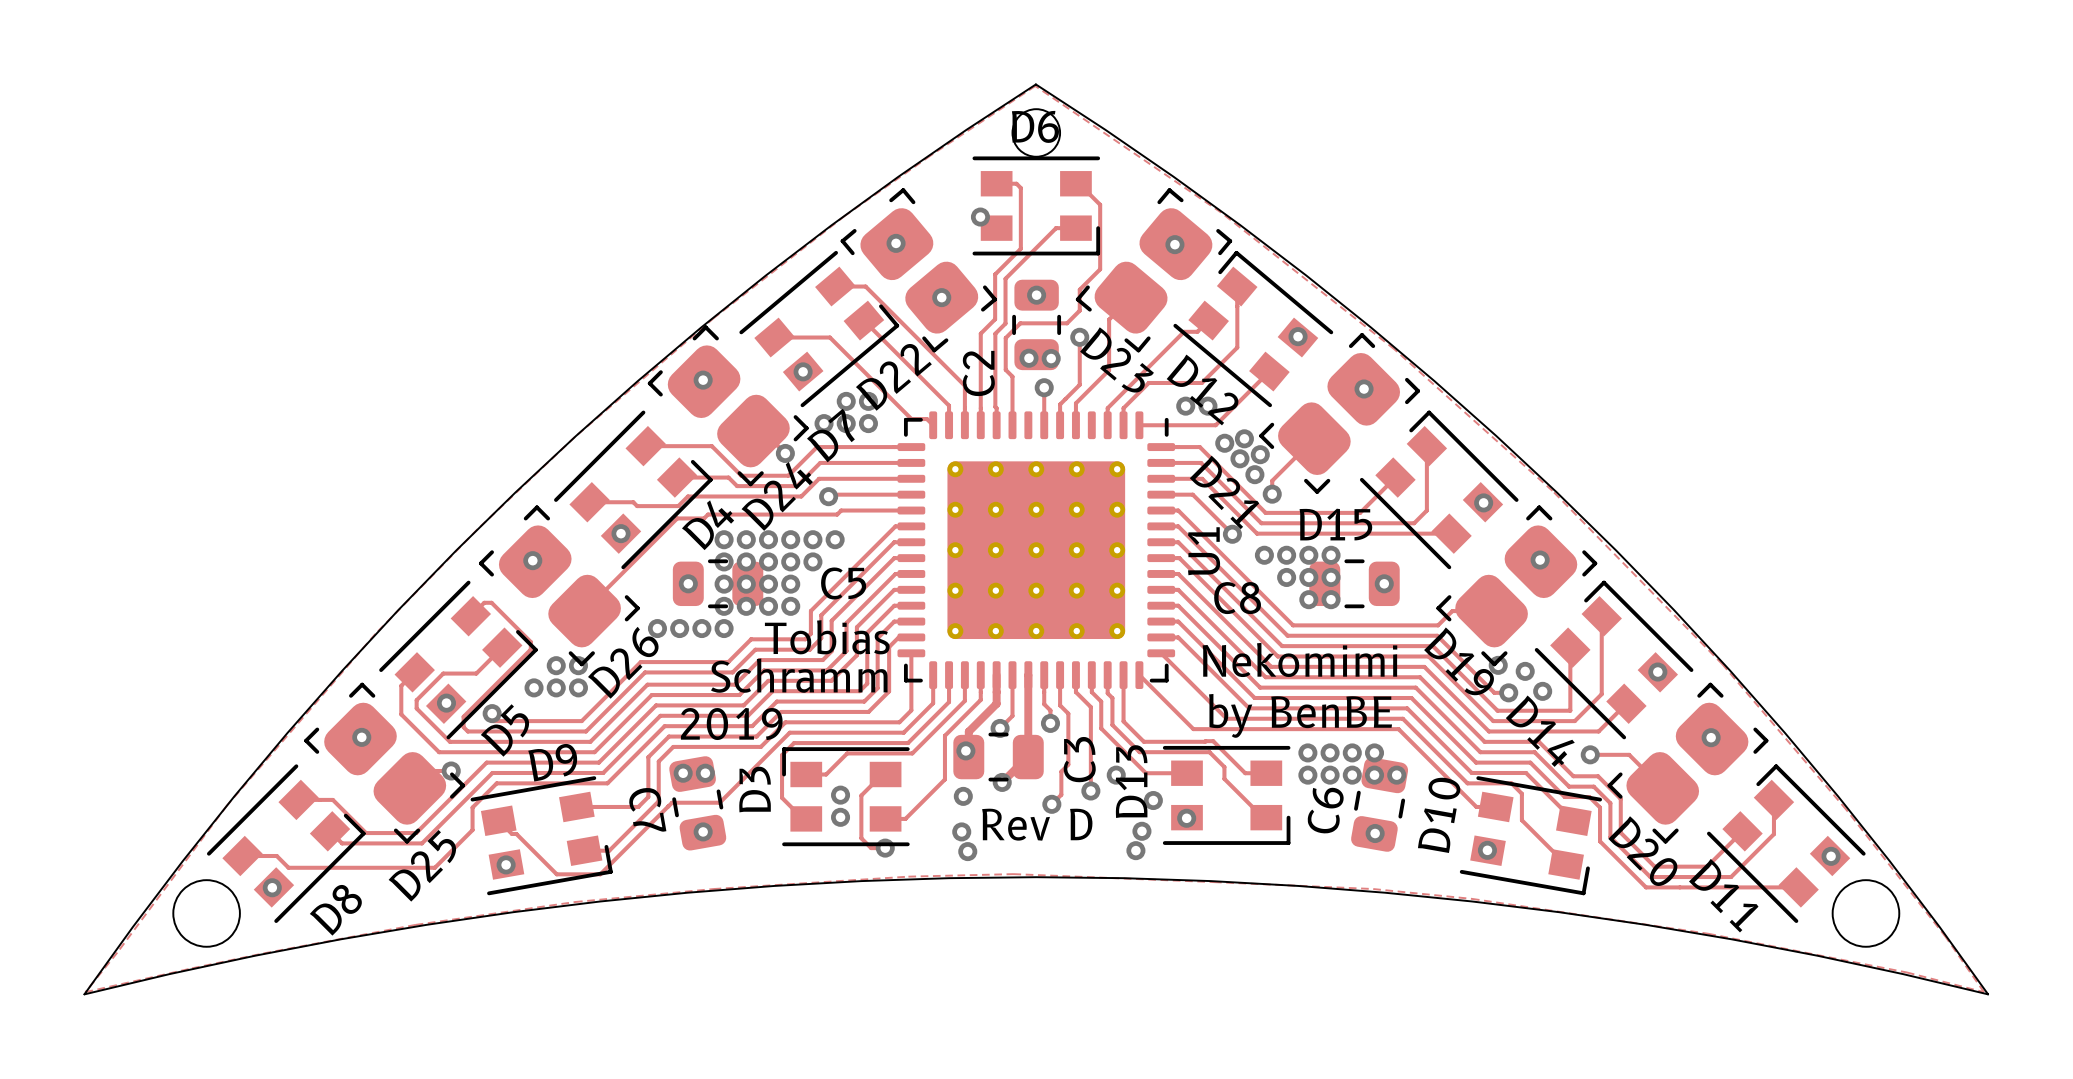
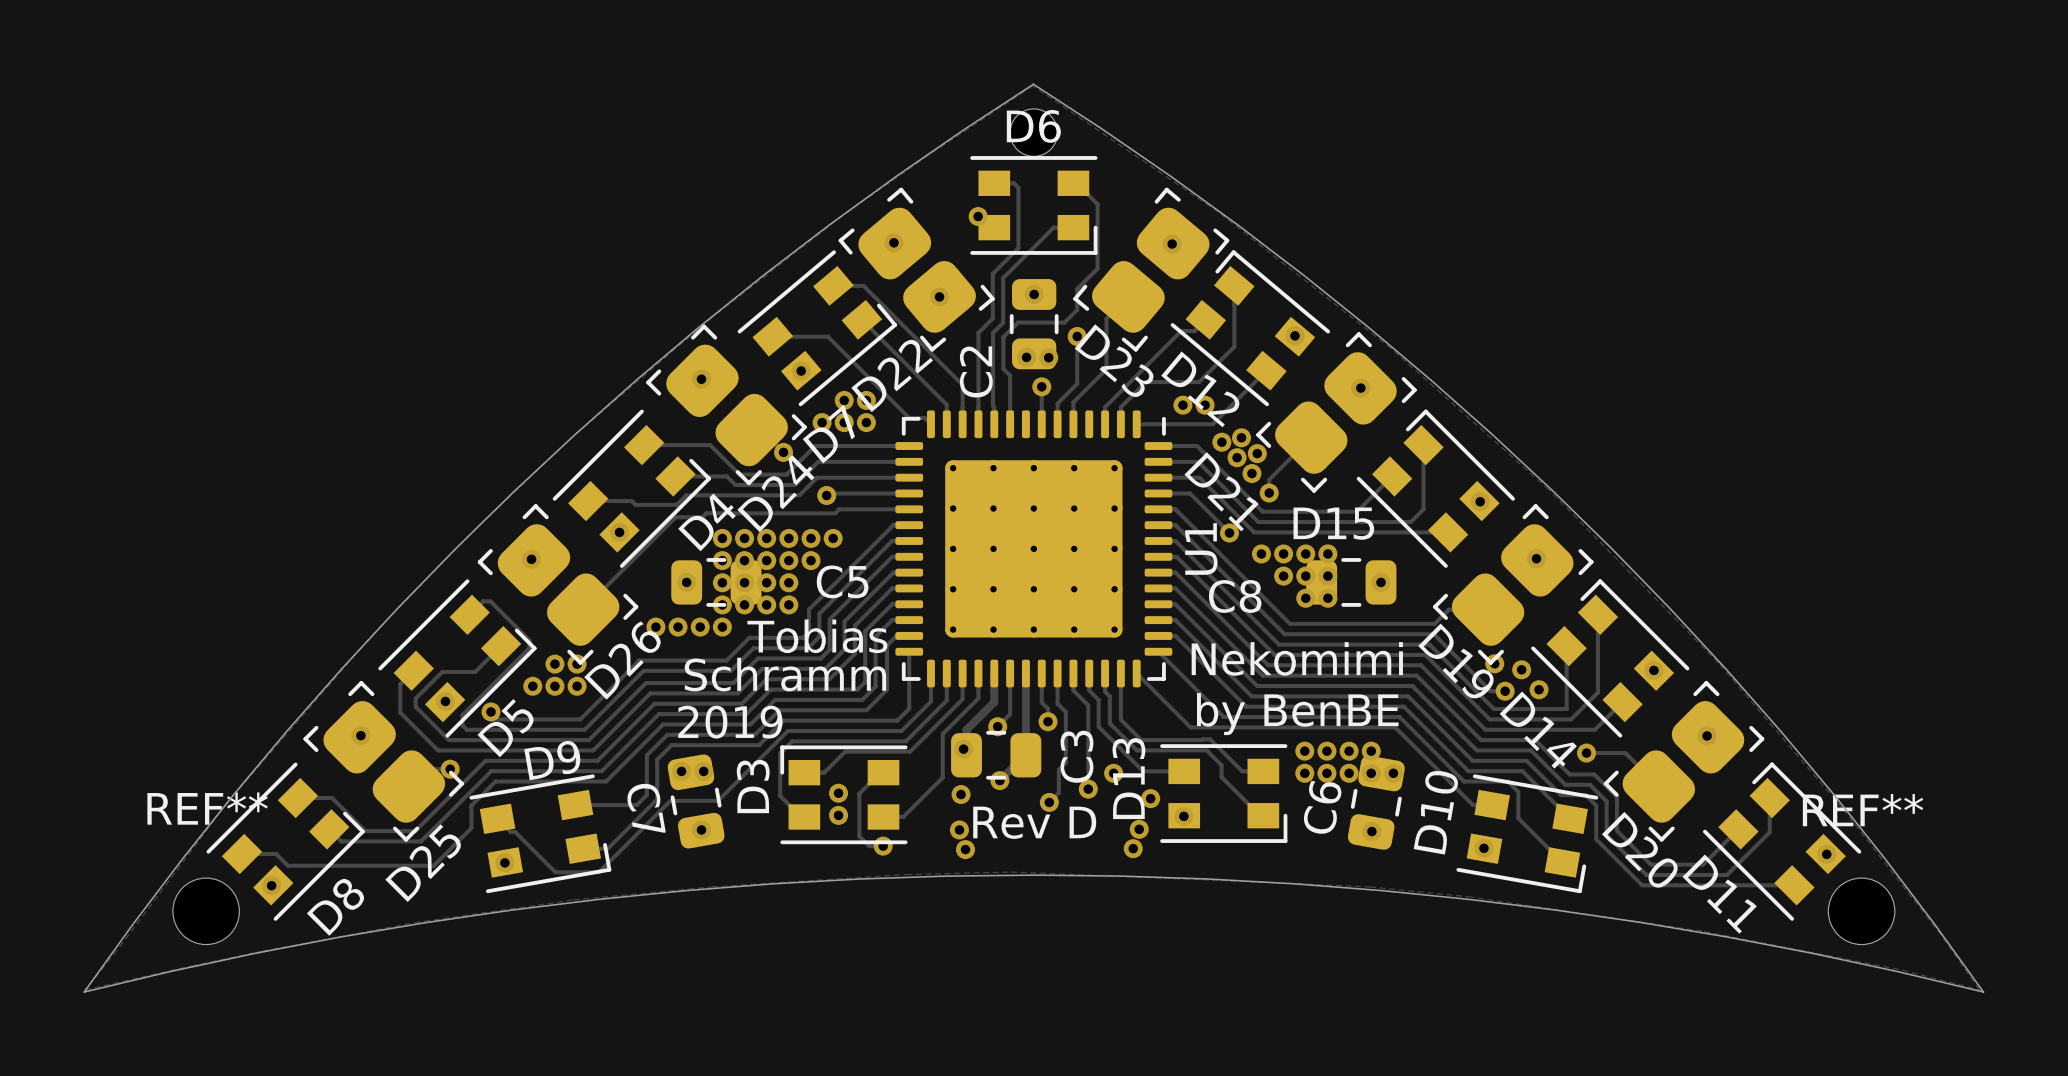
REF** name: none -> REF** (207, 808)
REF** name: none -> REF** (1863, 810)

